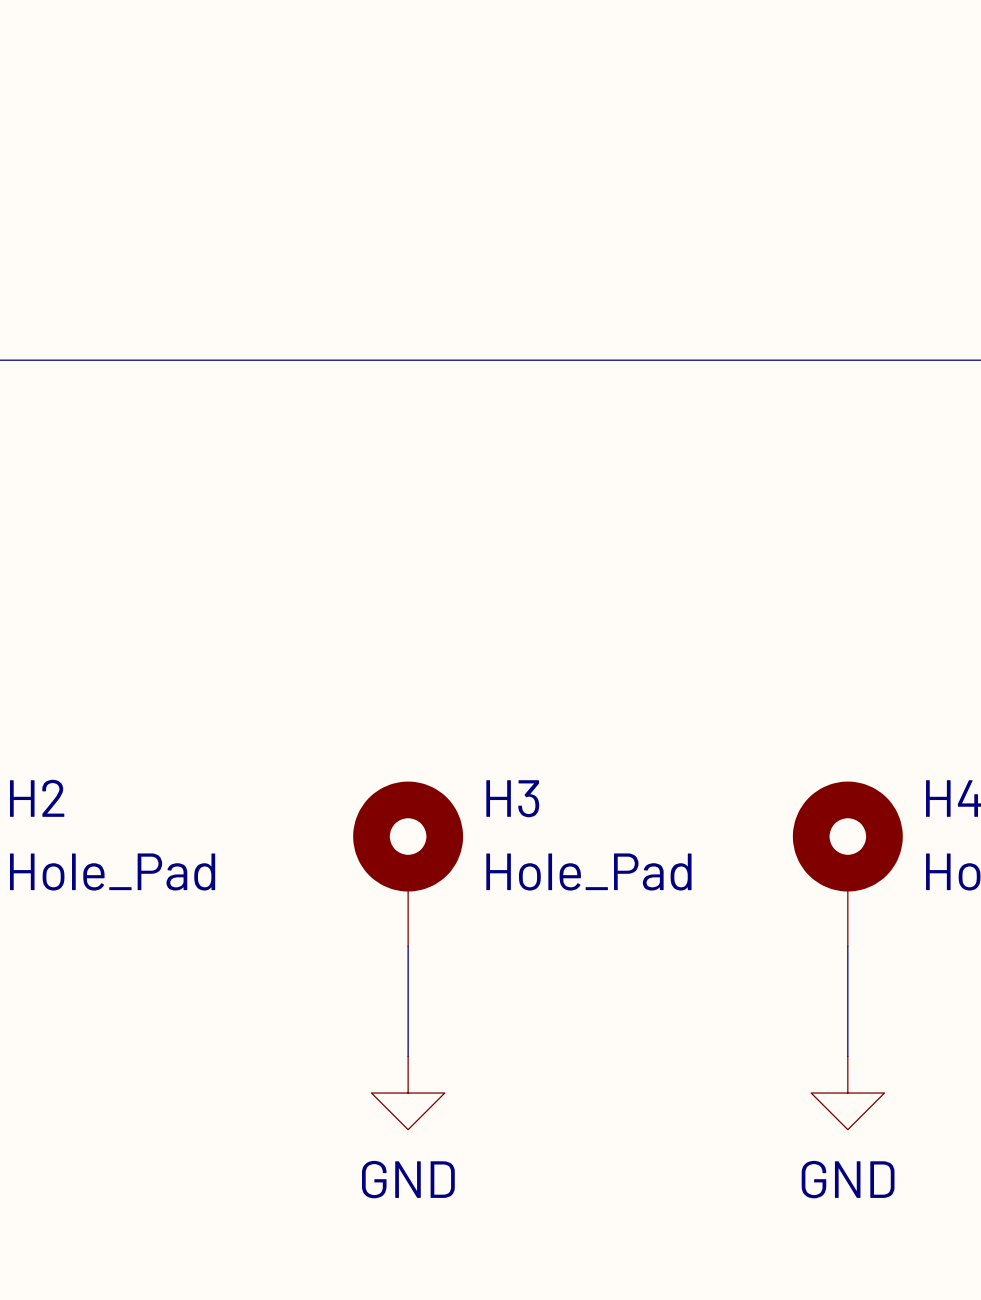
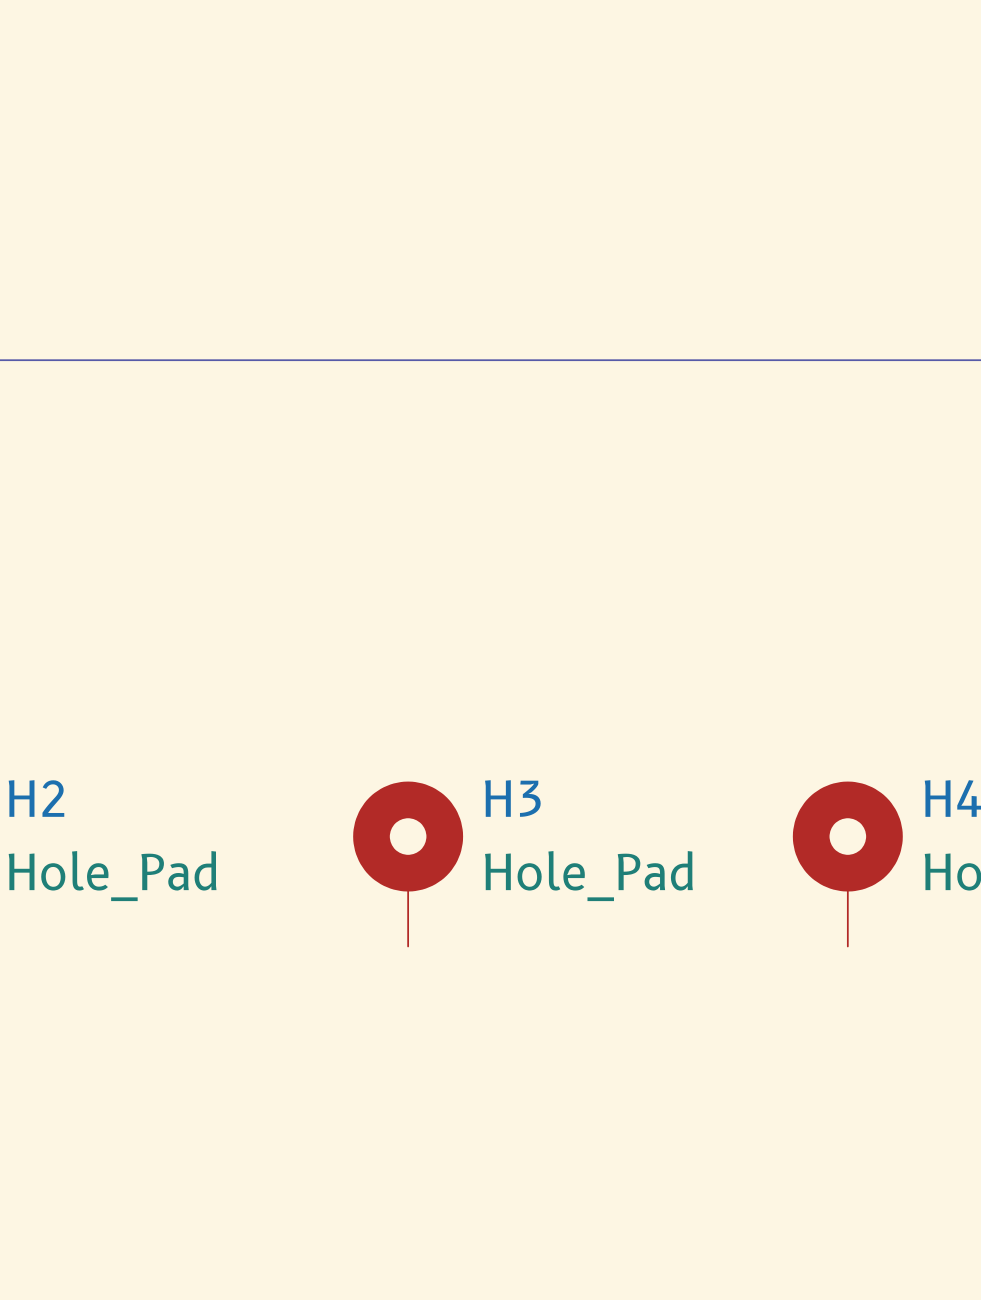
wire: (408, 946) (408, 1056) -> none
wire: (847, 946) (847, 1056) -> none
power symbol: GND (408, 1093) -> none
power symbol: GND (847, 1093) -> none

